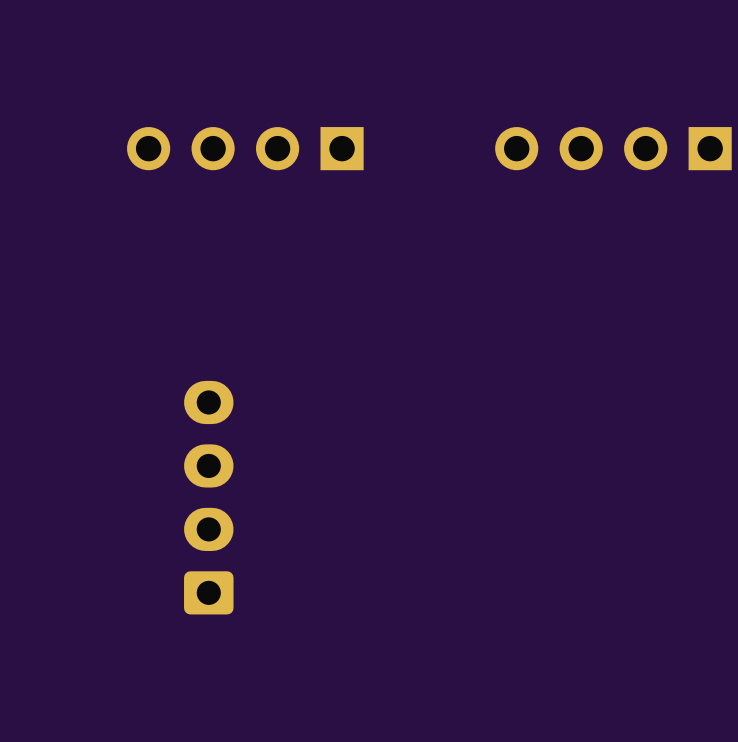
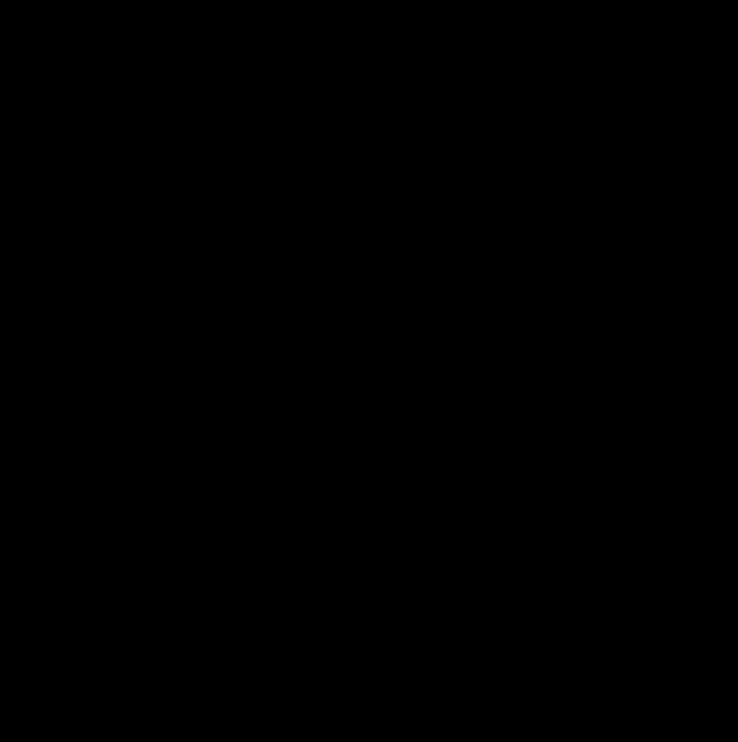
part: (245, 148) -> none
part: (613, 148) -> none
part: (208, 497) -> none

